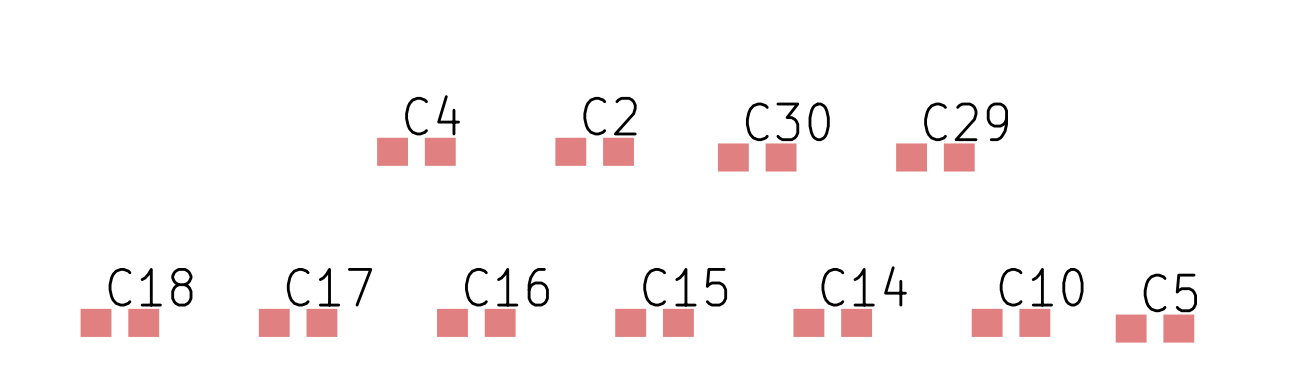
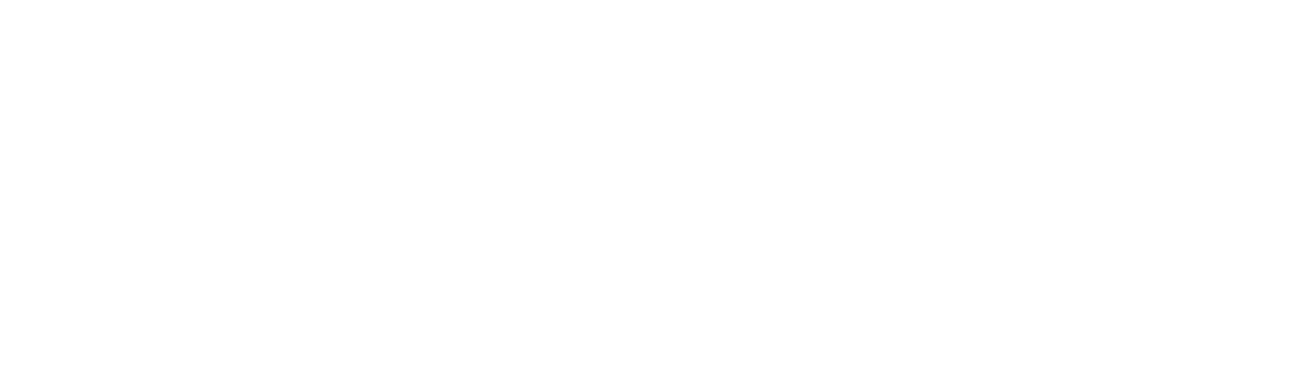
C4: (416, 151) -> none
C2: (594, 151) -> none
C30: (757, 157) -> none
C29: (935, 157) -> none
C18: (119, 322) -> none
C17: (298, 322) -> none
C16: (476, 322) -> none
C15: (654, 322) -> none
C14: (832, 322) -> none
C10: (1010, 322) -> none
C5: (1154, 328) -> none

